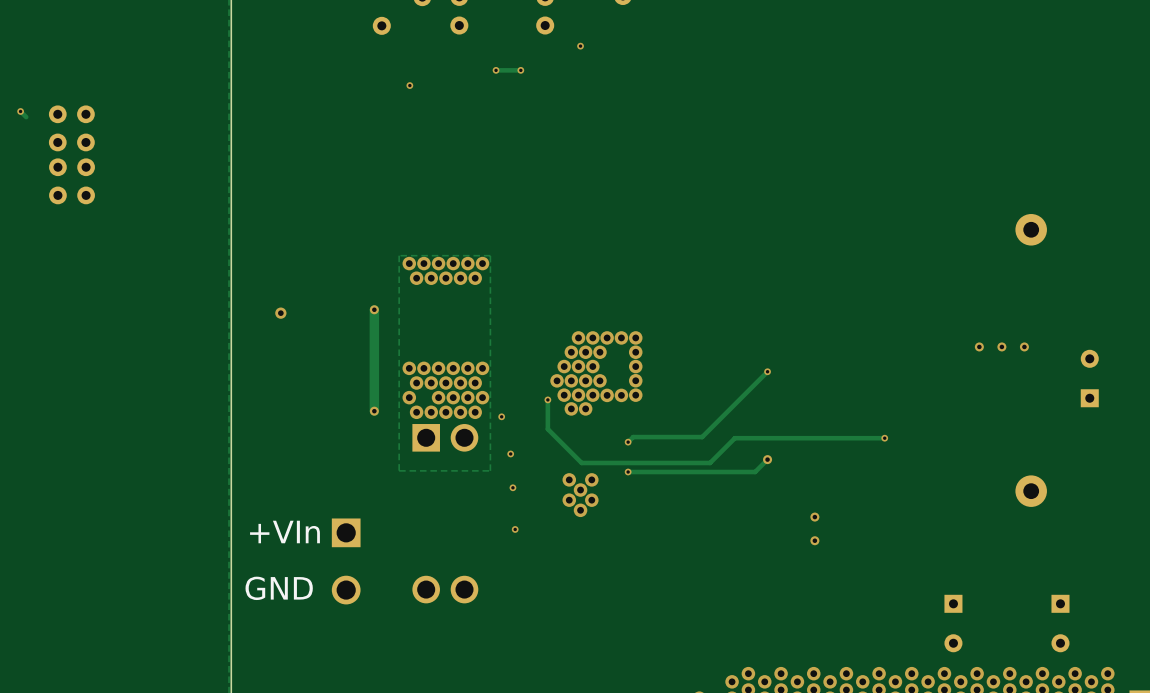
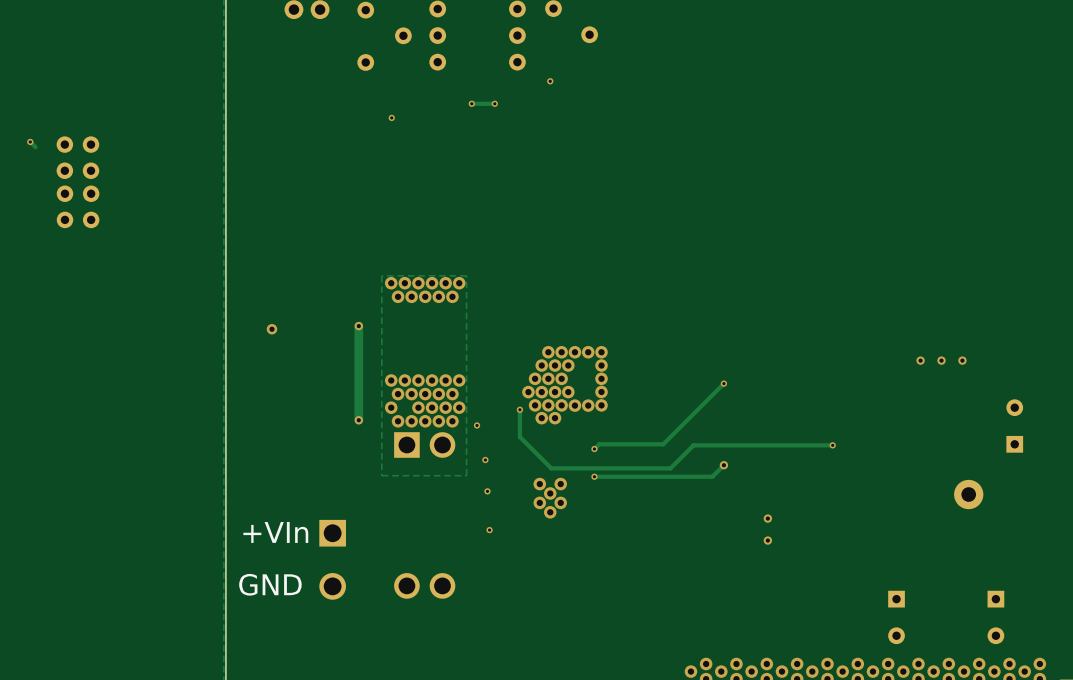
part: (1031, 229) -> none
part position: (1089, 378) -> (1014, 426)

